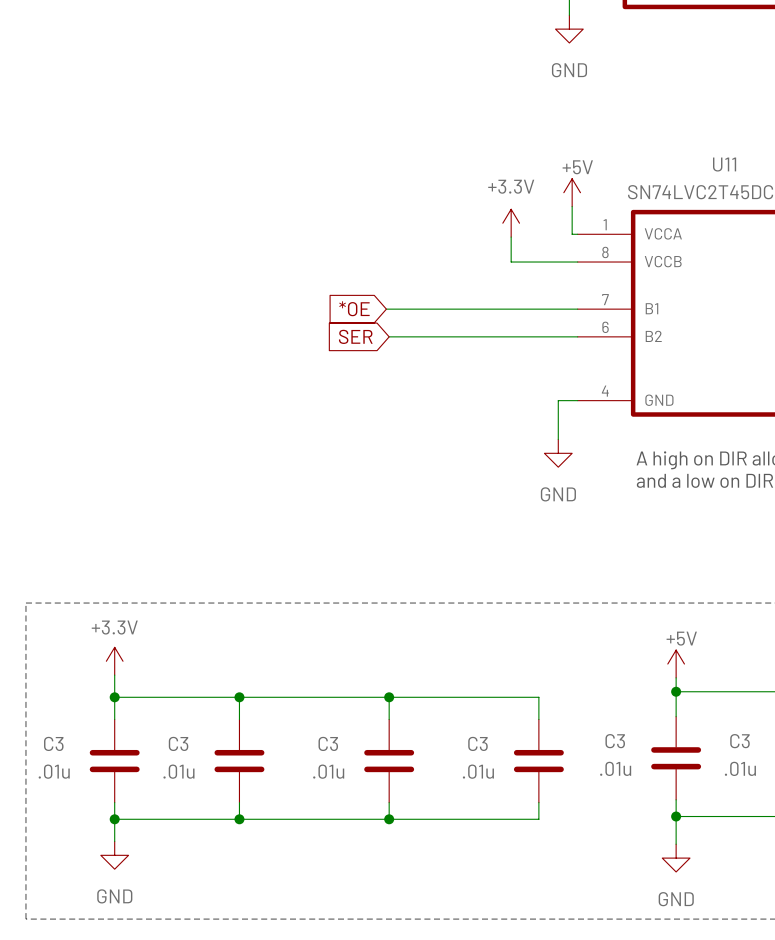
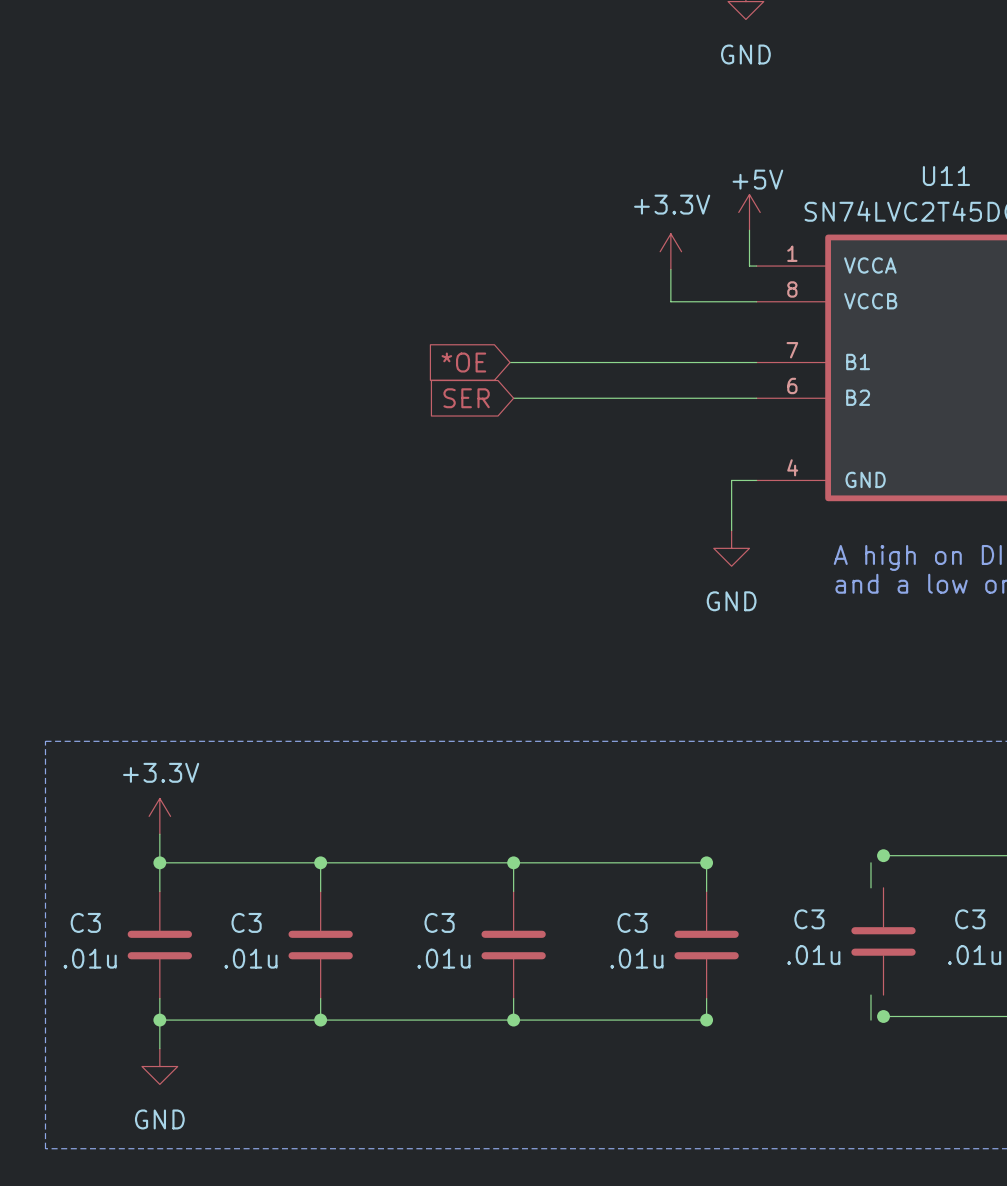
power symbol: +5V (676, 664) -> none
wire: (676, 677) (676, 716) -> none
junction: none -> (706, 862)
wire: none -> (870, 862) (870, 887)
wire: none -> (870, 995) (870, 1020)
wire: (676, 799) (676, 844) -> none
junction: none -> (706, 1020)
power symbol: GND (676, 858) -> none

